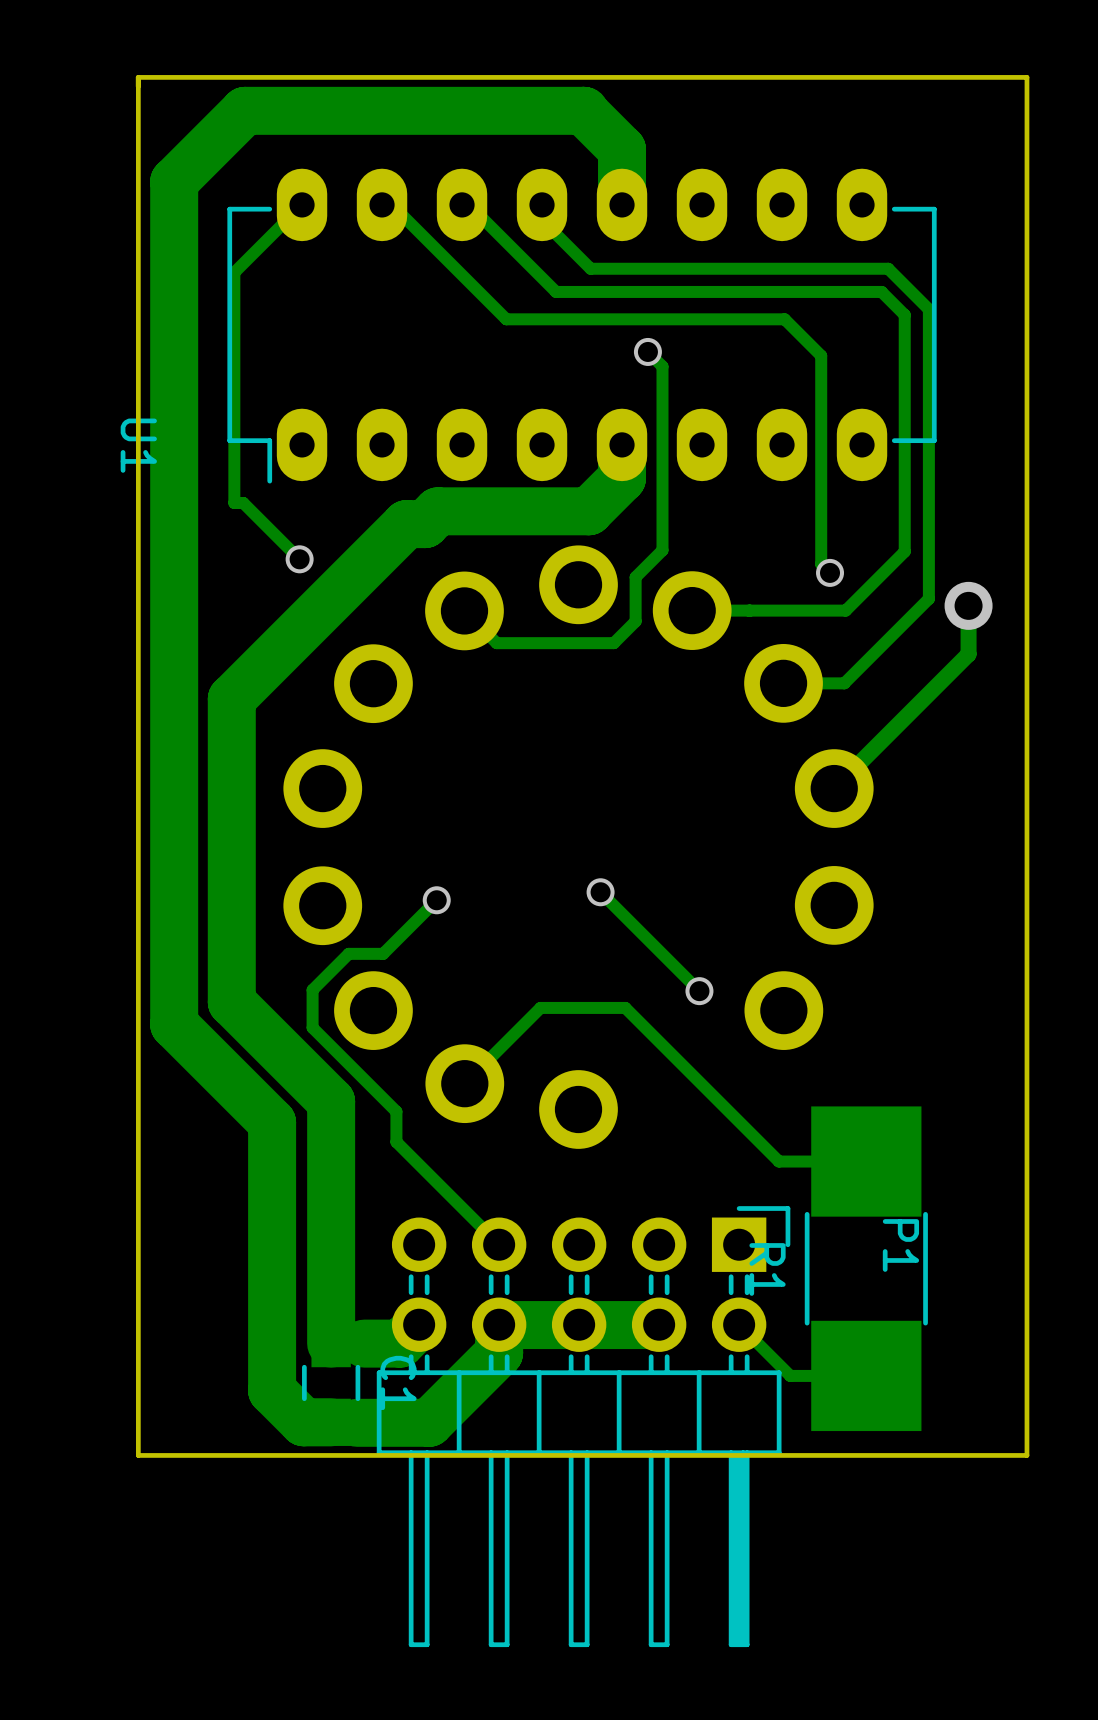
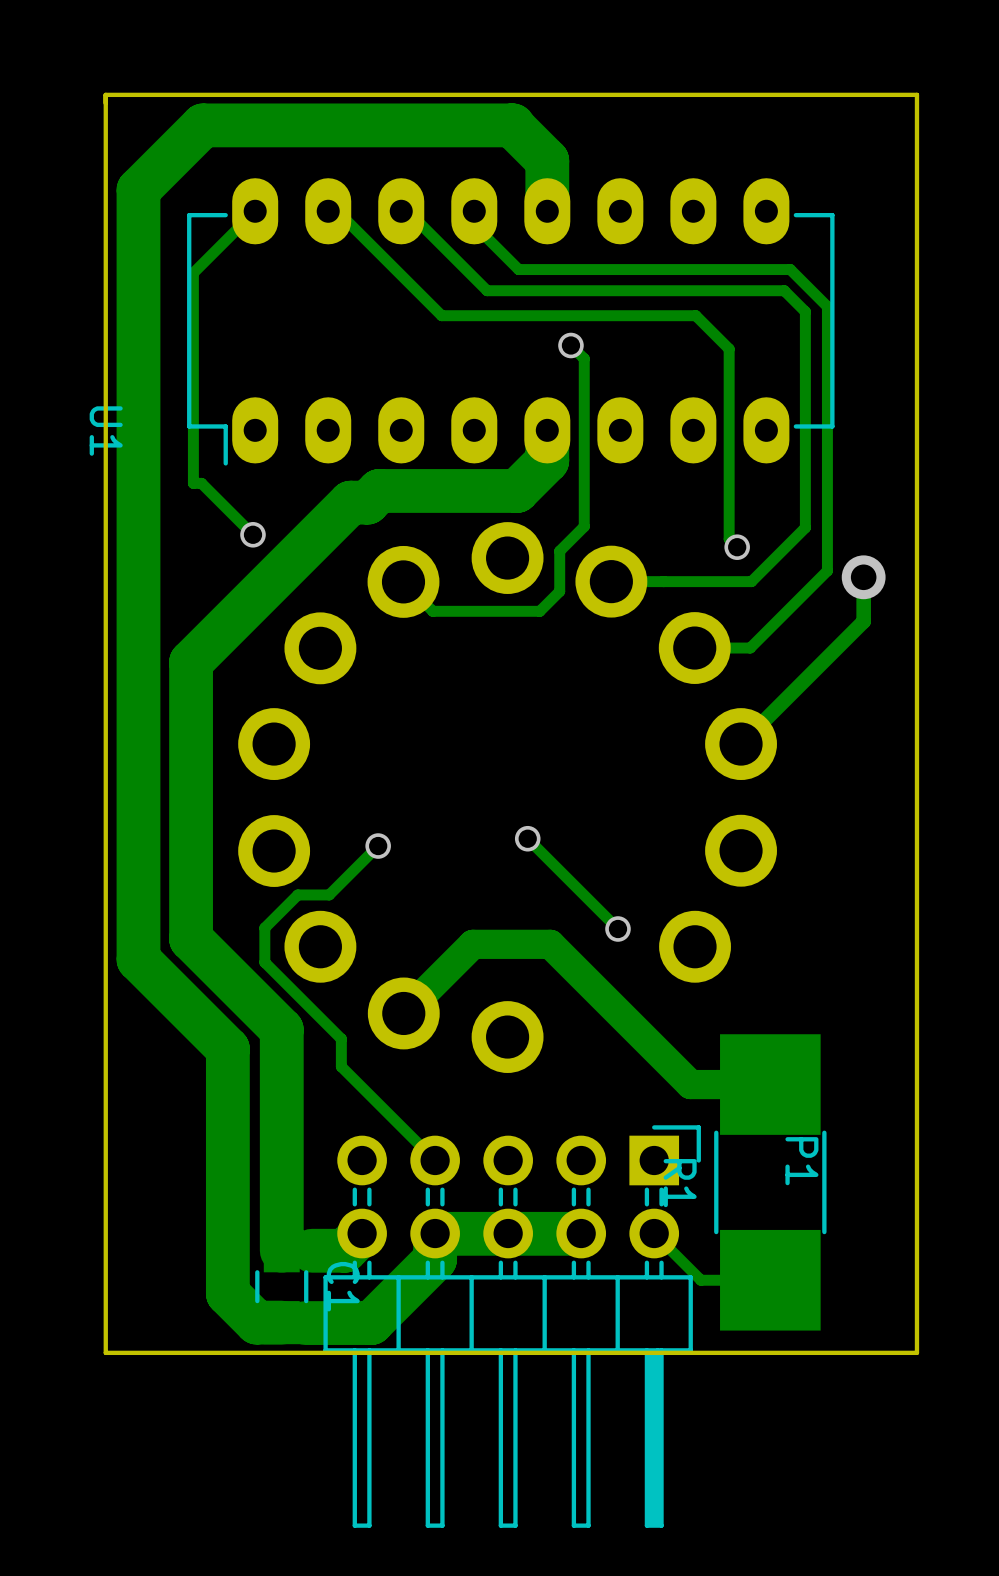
track width: thin (464, 1083) (540, 1007) (625, 1007) (778, 1161) (866, 1161) -> thick (403, 1013) (472, 944) (550, 944) (690, 1084) (770, 1084)

